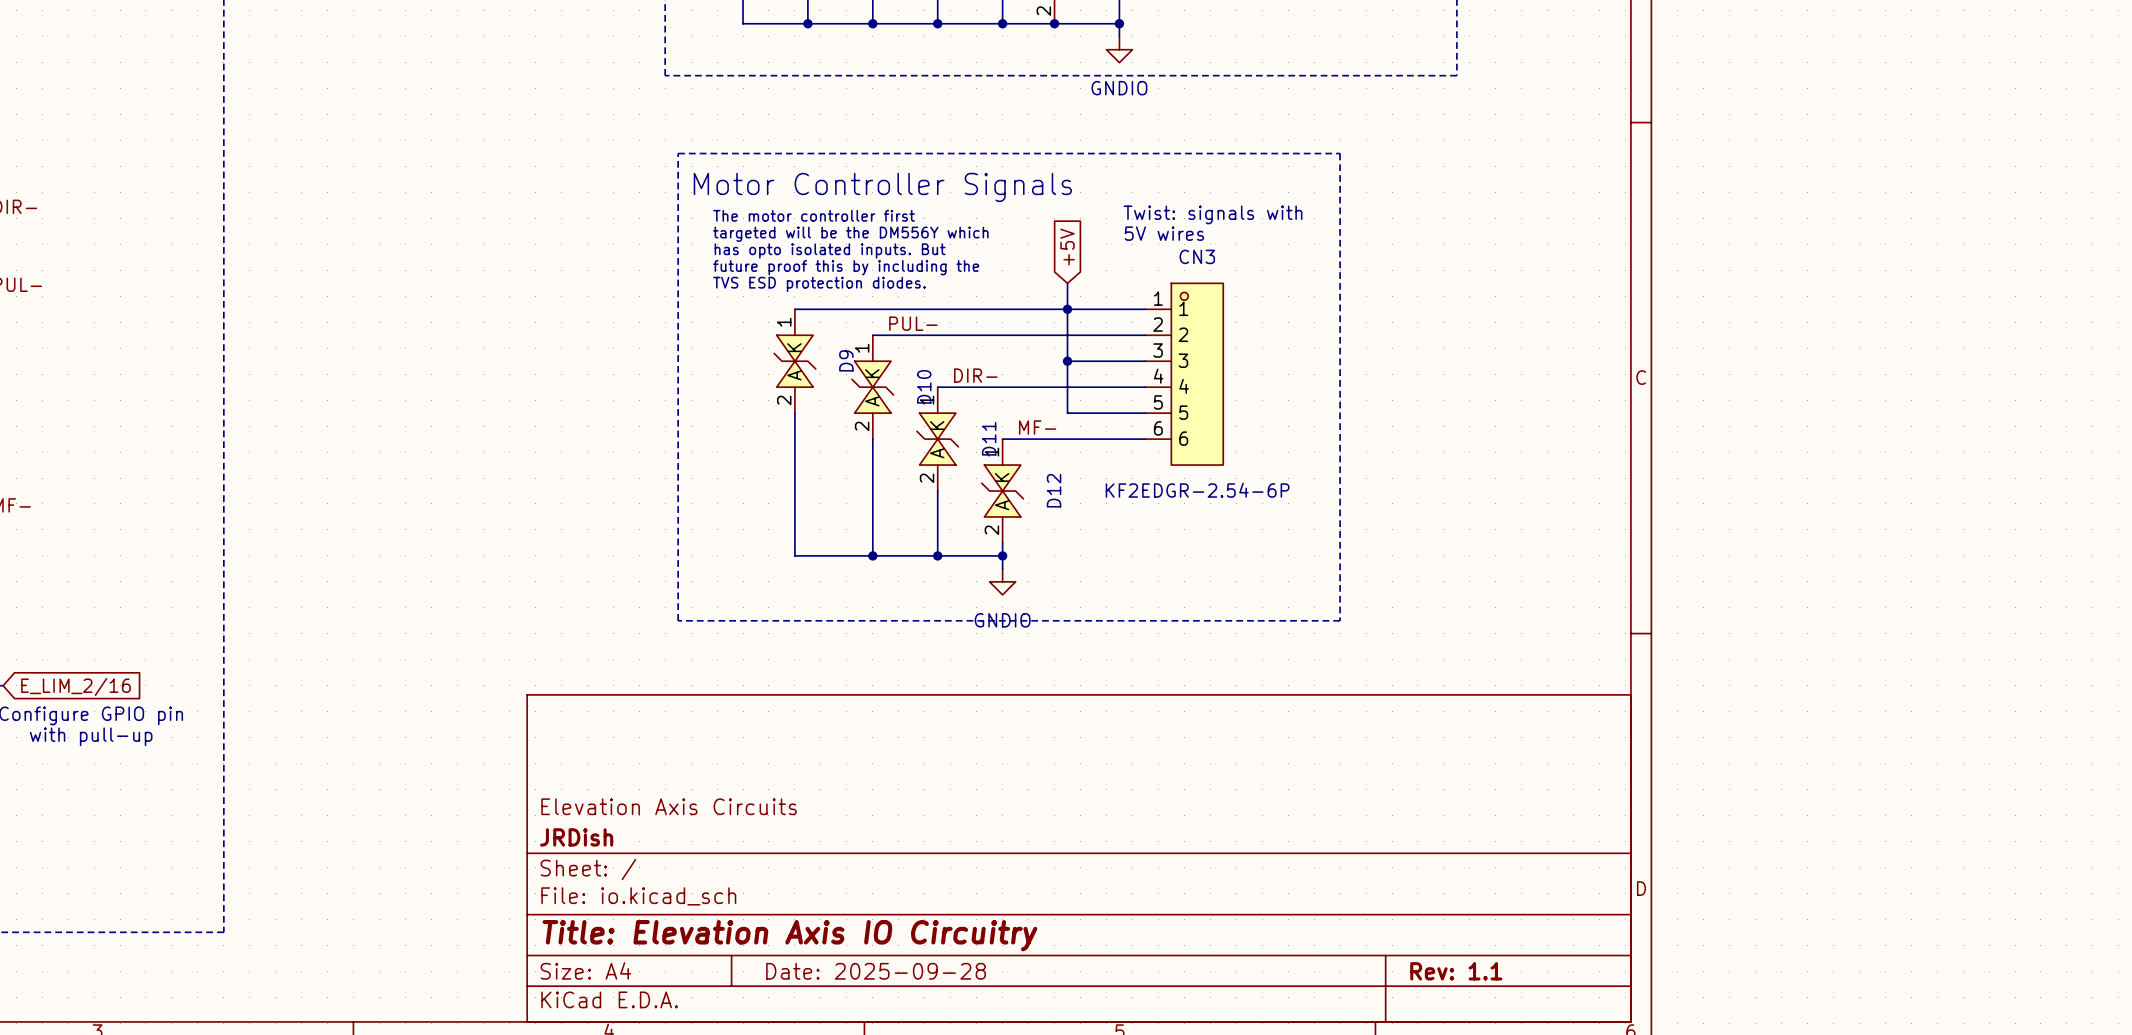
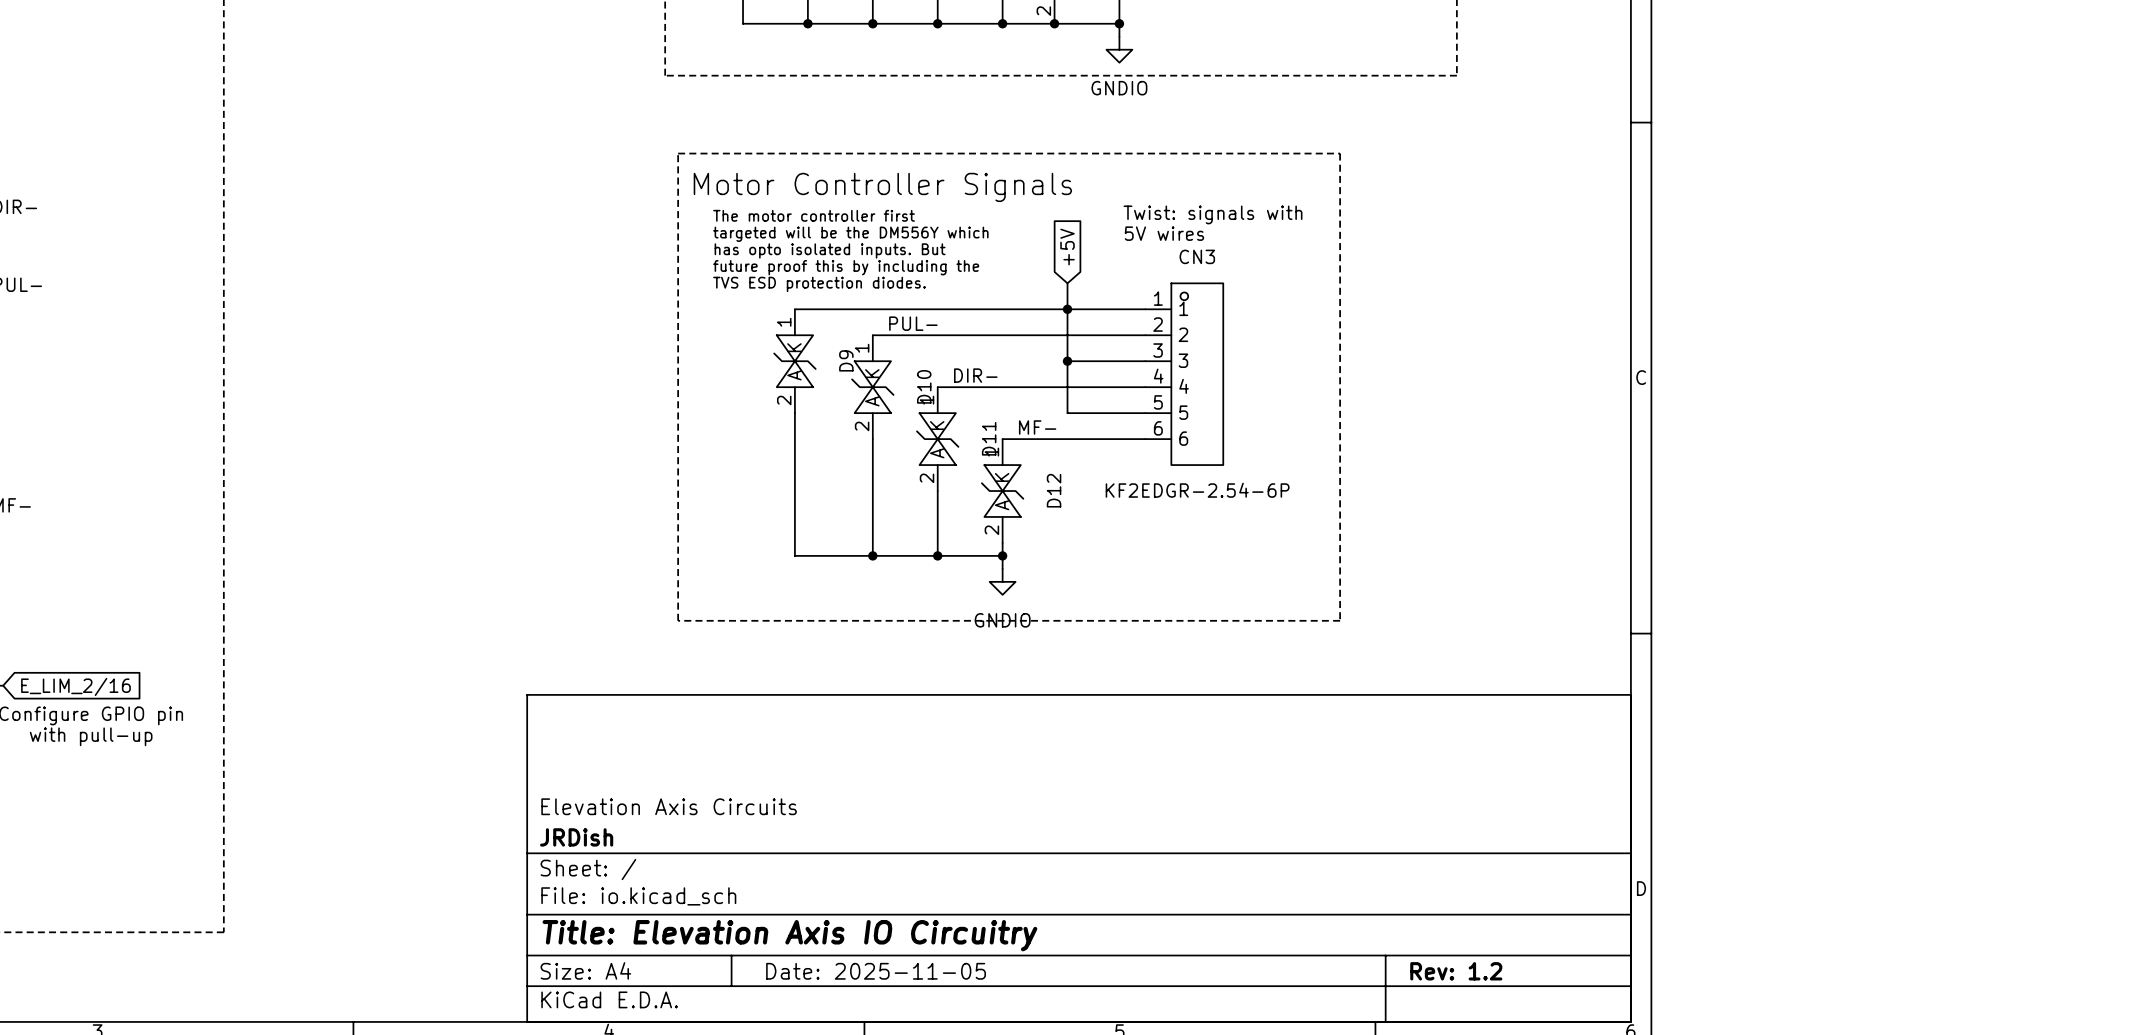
title block: Date: 2025-09-28 (876, 971) -> Date: 2025-11-05 (876, 971)
title block: Rev: 1.1 (1456, 971) -> Rev: 1.2 (1456, 971)

